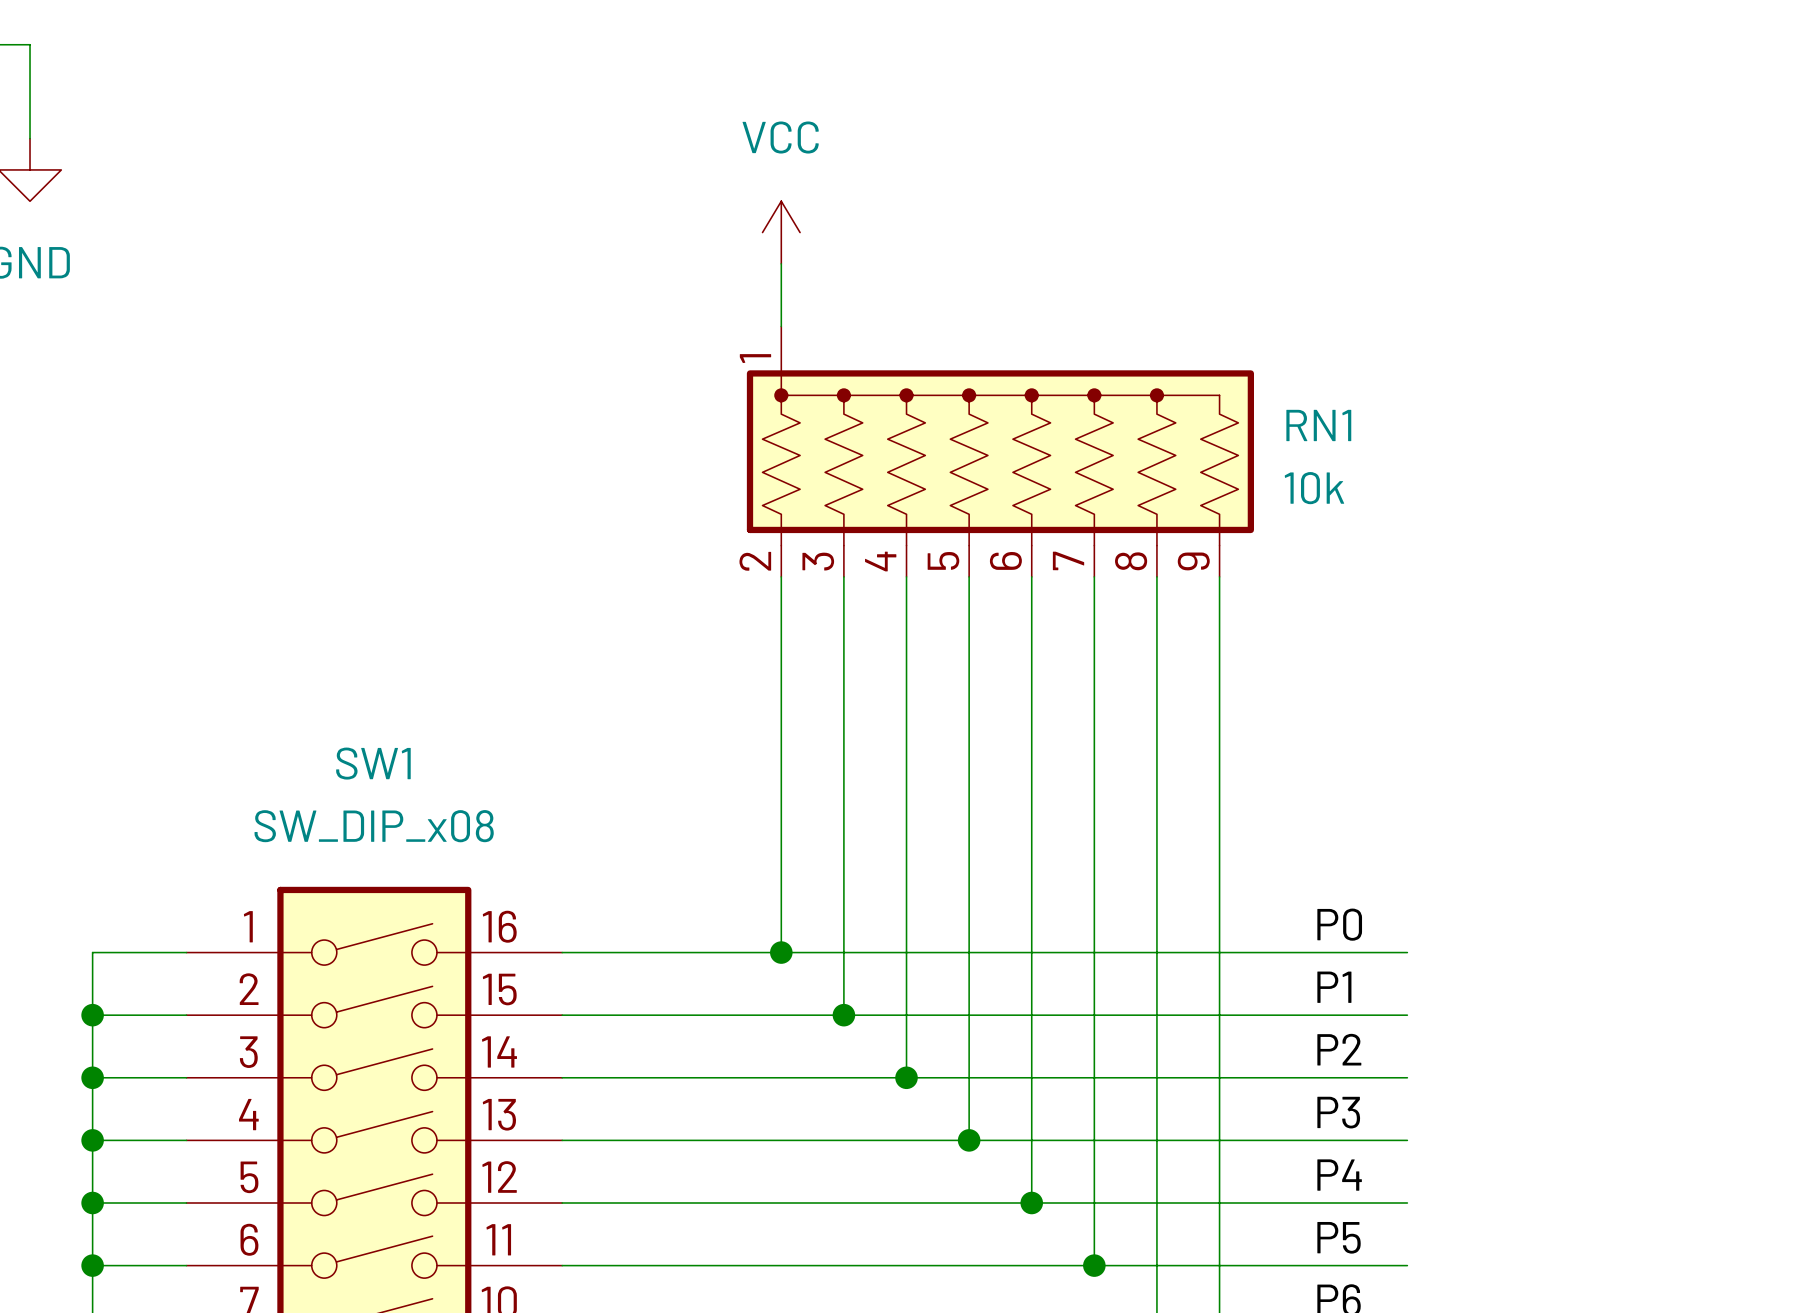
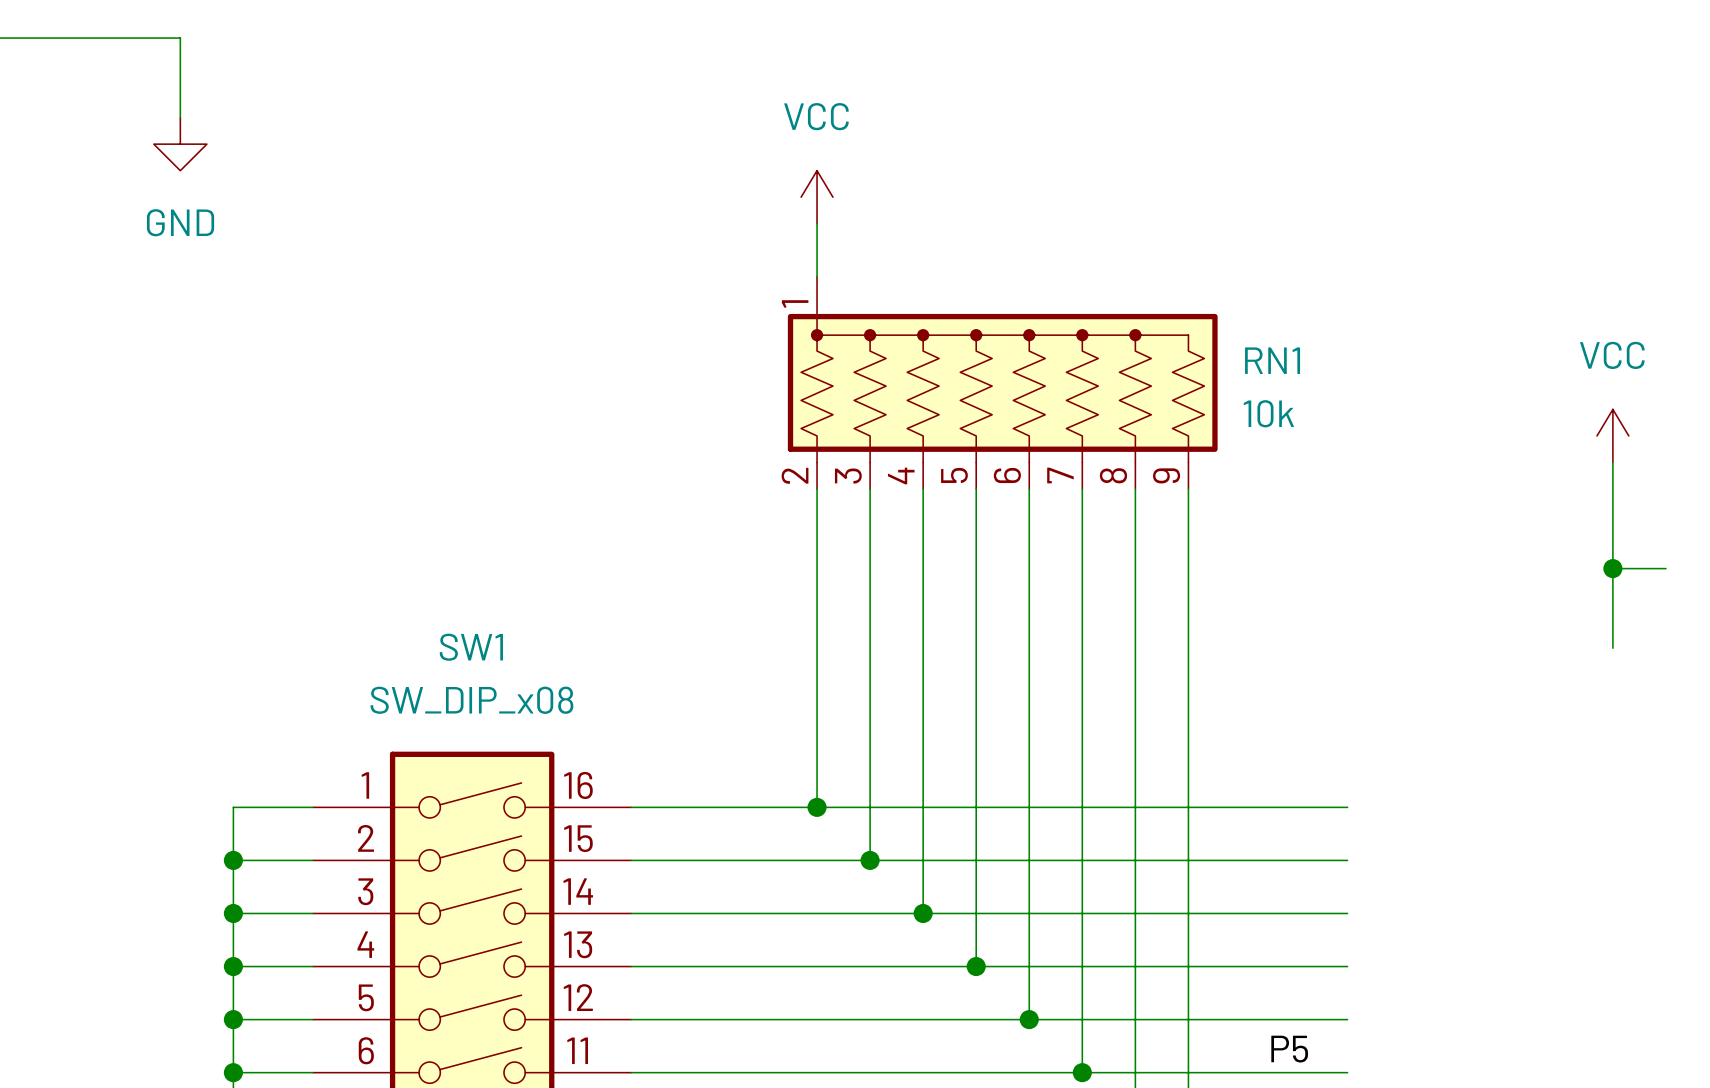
power symbol: none -> VCC (1612, 435)
wire: none -> (1612, 462) (1612, 648)
wire: none -> (1612, 568) (1665, 568)
junction: none -> (1612, 568)
label: P0 (1339, 924) -> none
label: P1 (1334, 987) -> none
label: P2 (1339, 1049) -> none
label: P3 (1338, 1112) -> none
label: P4 (1339, 1175) -> none

